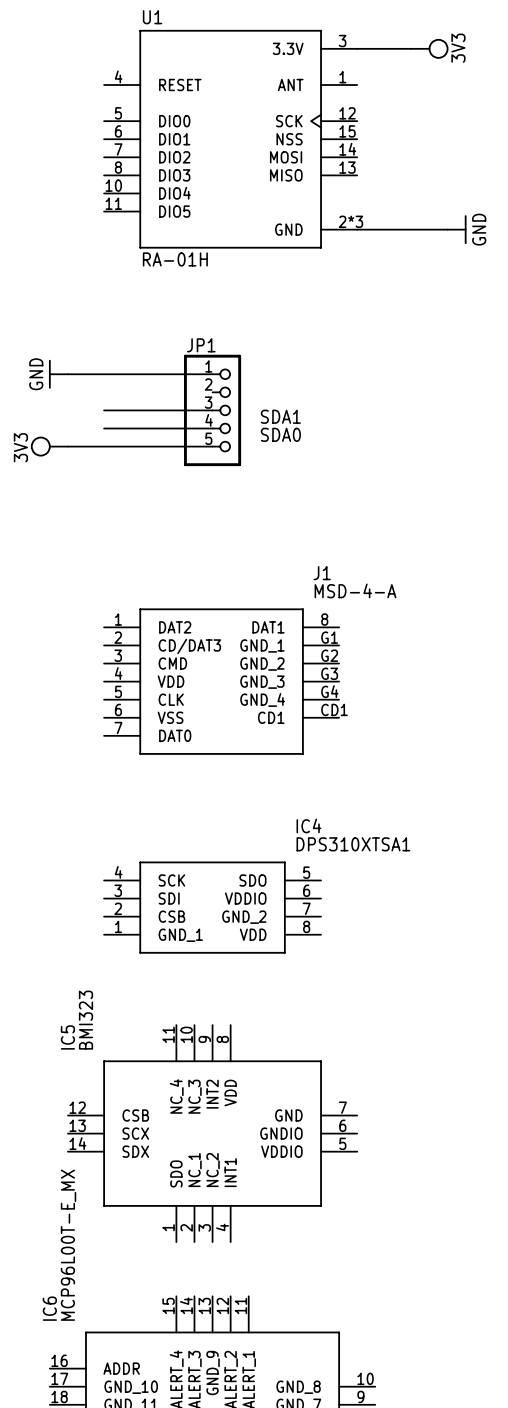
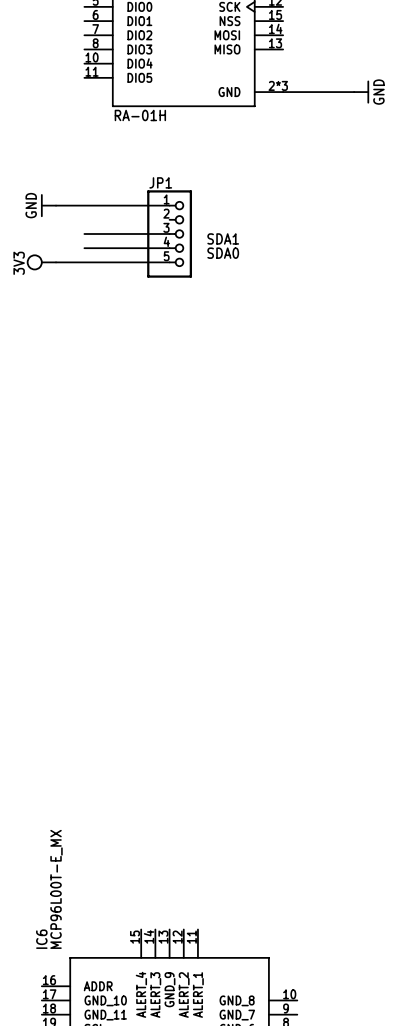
J1: MSD-4-A (221, 681) -> none
IC4: DPS310XTSA1 (212, 907) -> none
IC5: BMI323 (212, 1133) -> none

